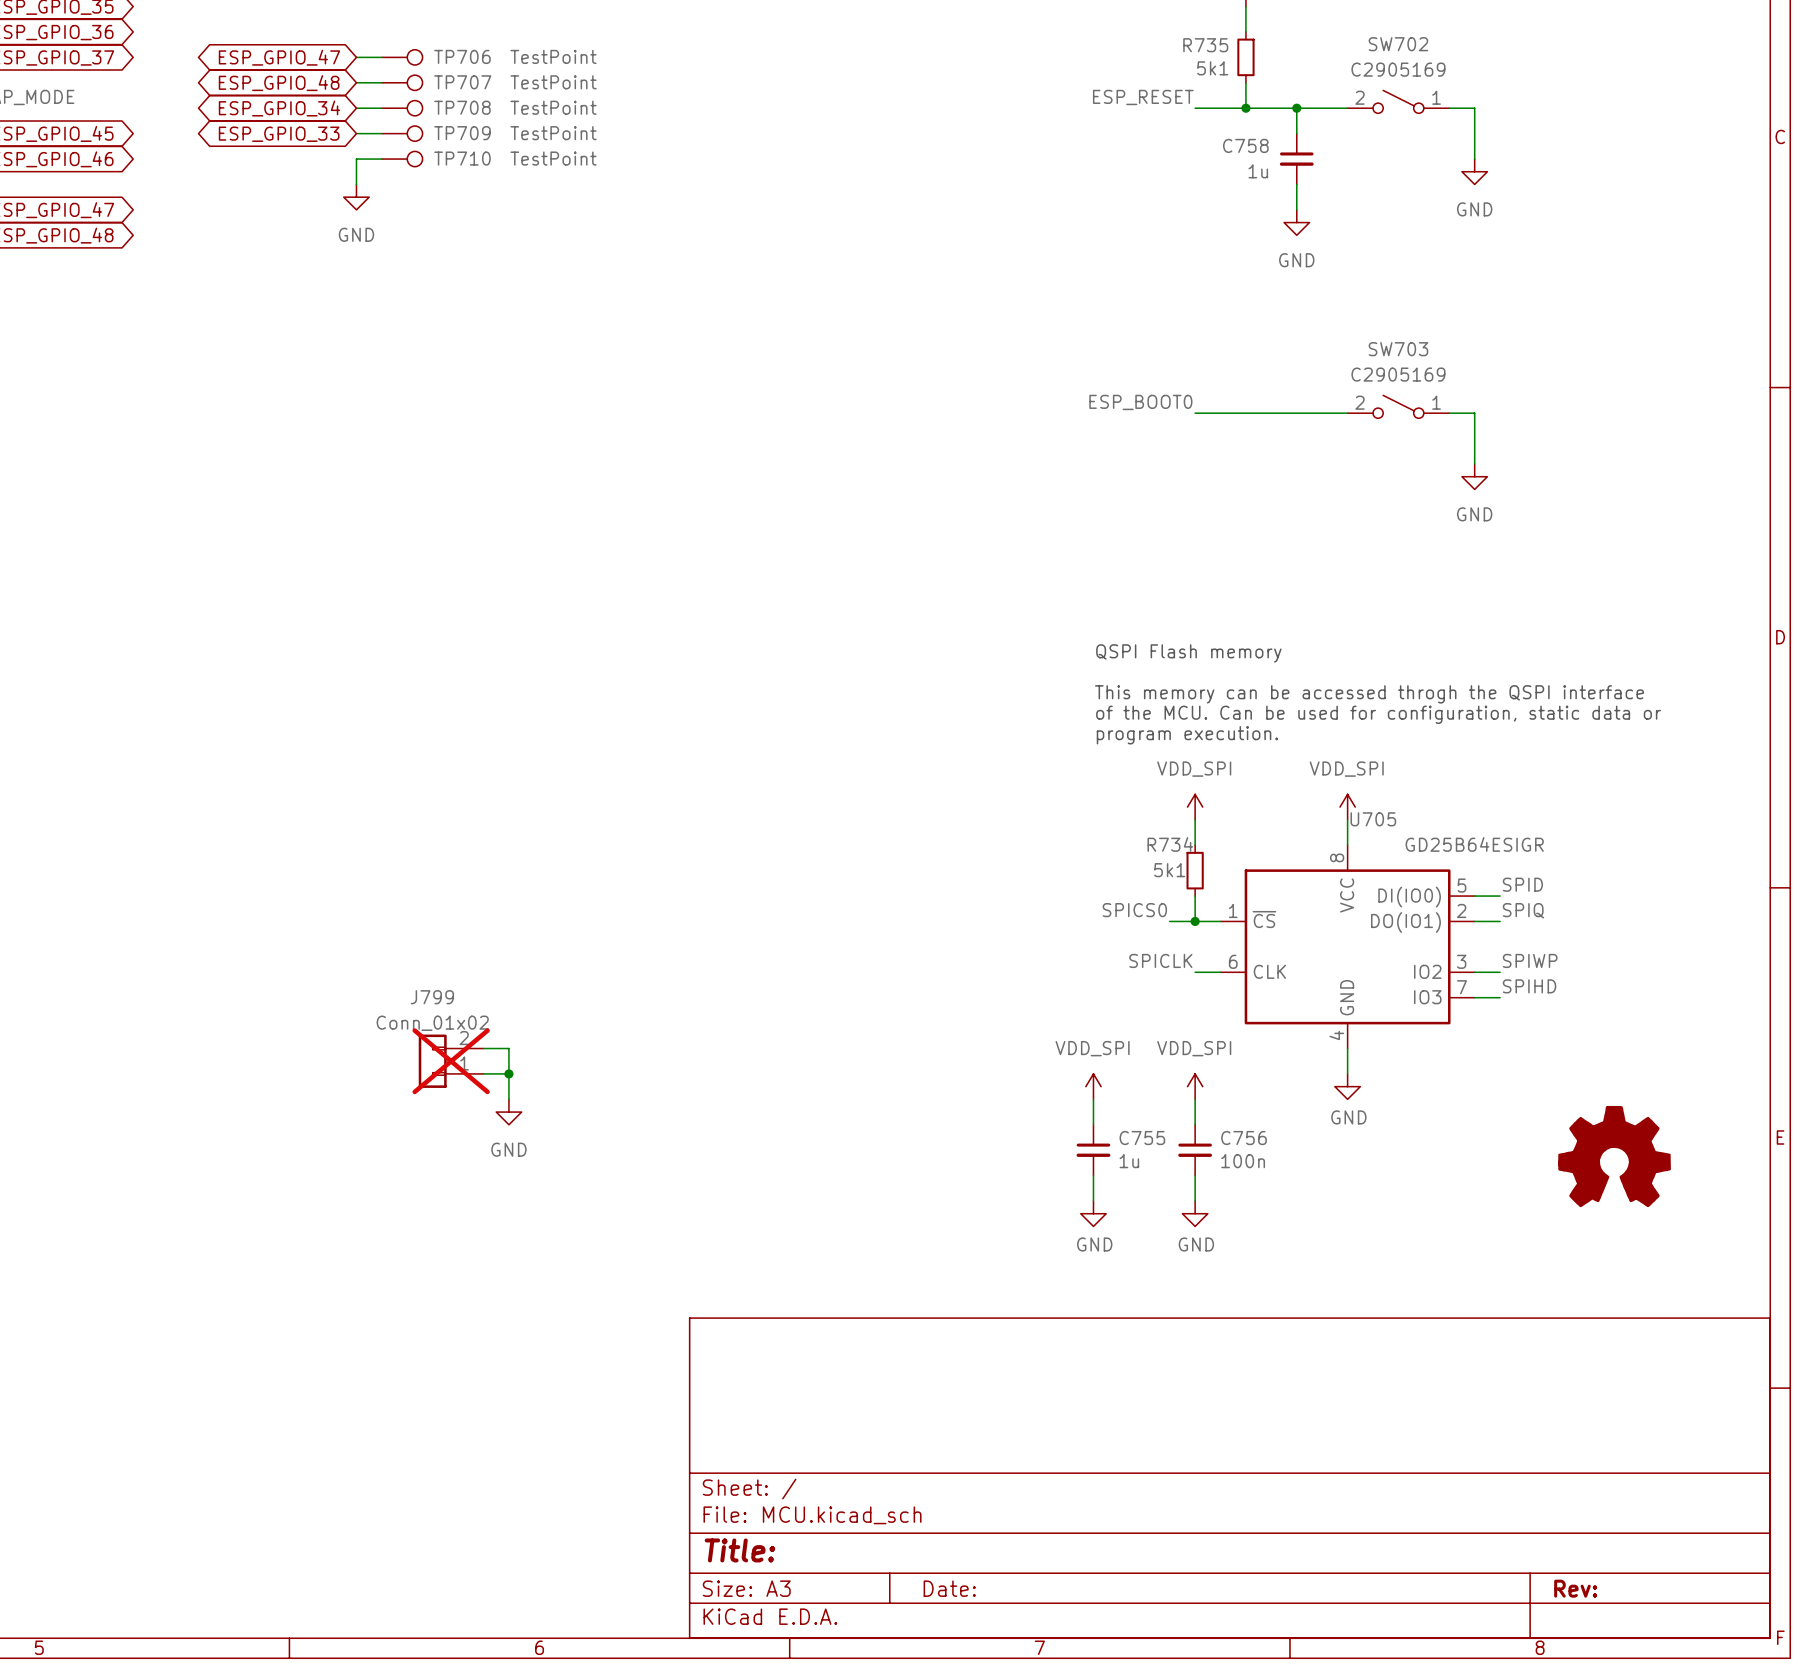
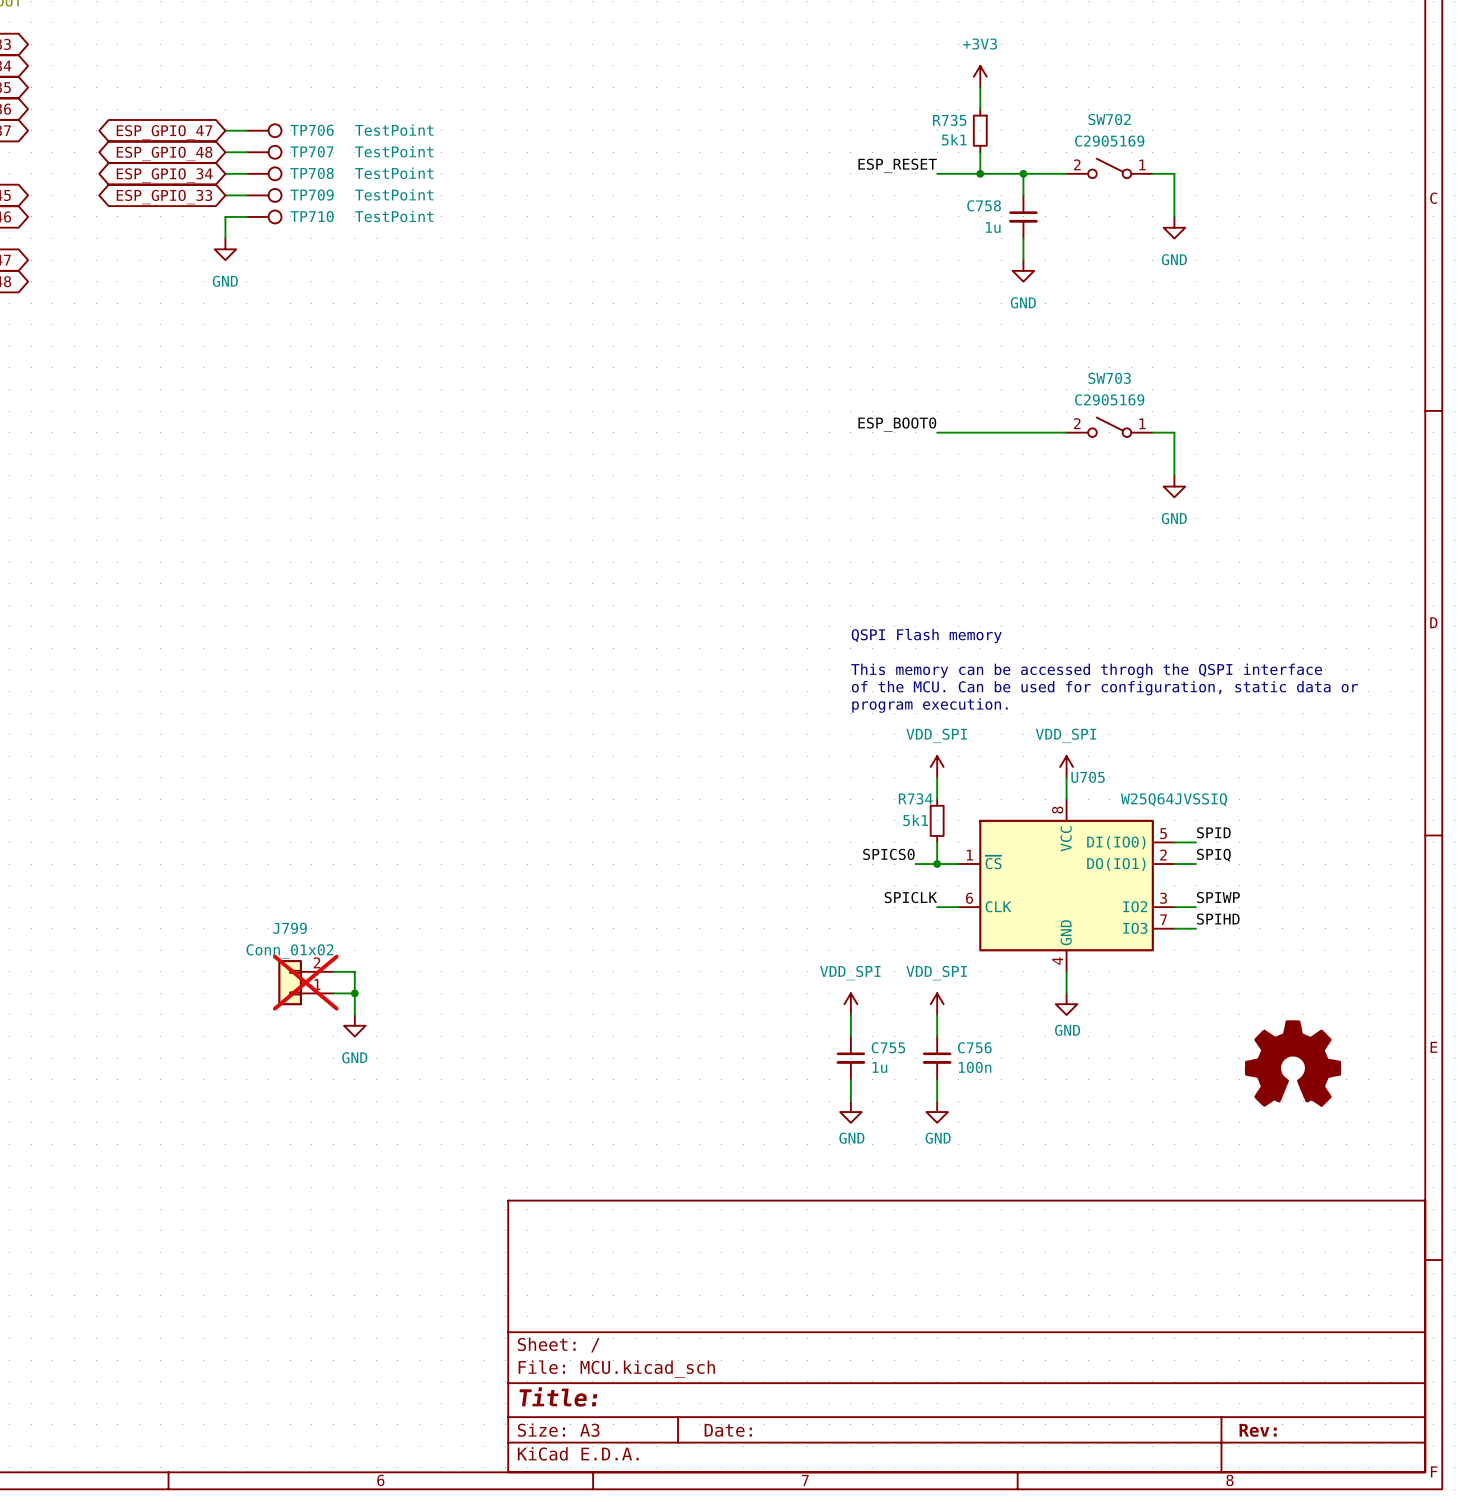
U705 value: GD25B64ESIGR (1474, 844) -> W25Q64JVSSIQ (1173, 799)

